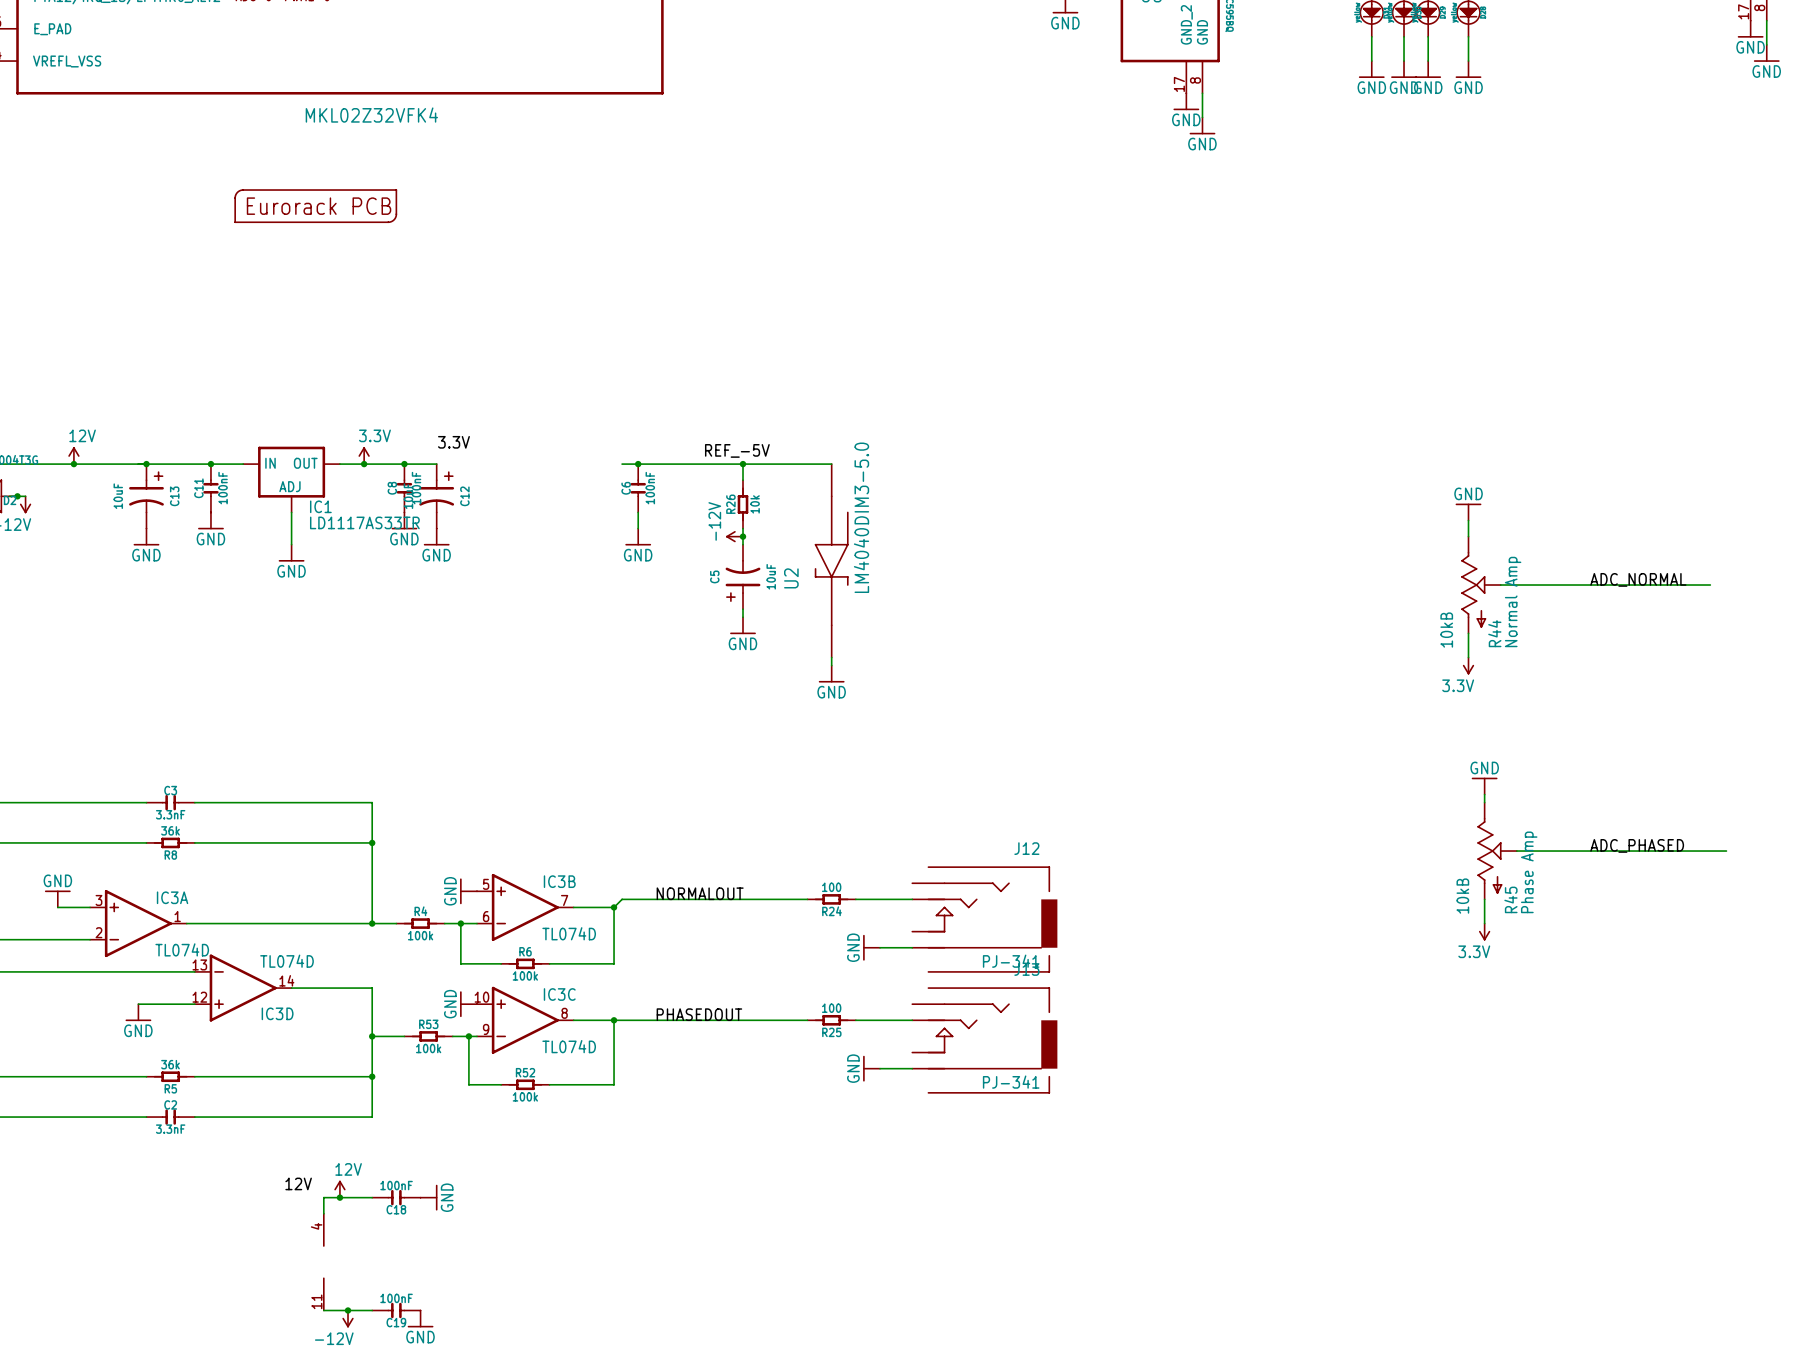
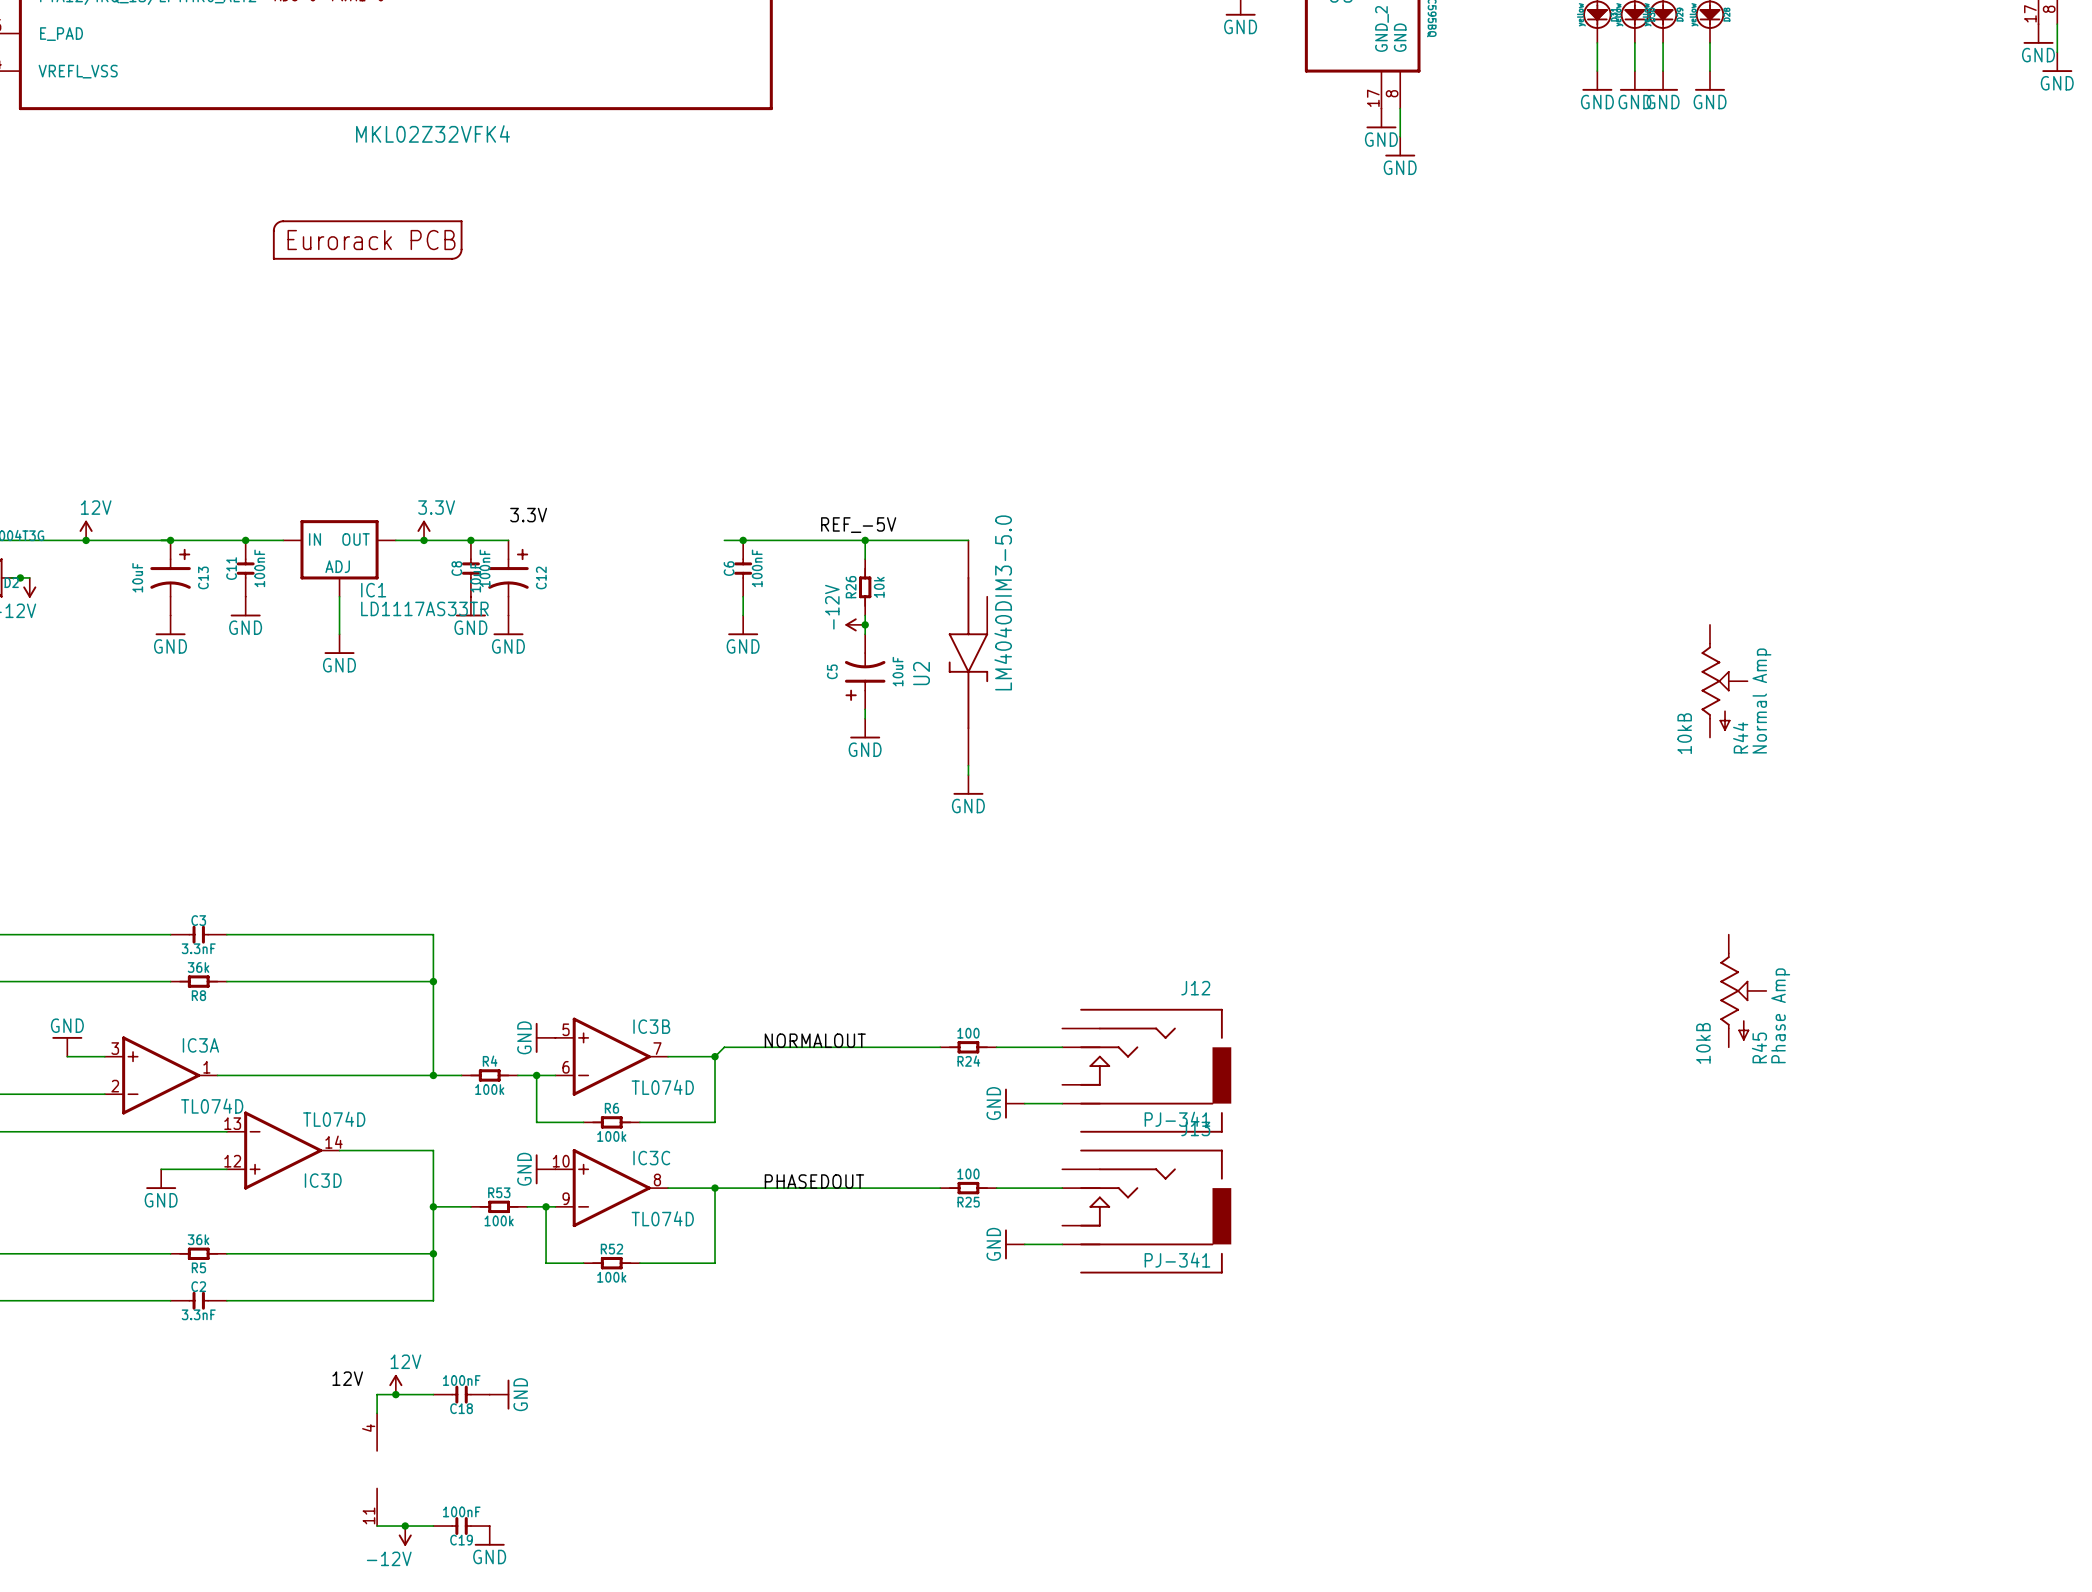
power symbol: GND (1468, 512) -> none
wire: (1468, 520) (1468, 536) -> none
label: ADC_NORMAL (1638, 579) -> none
wire: (1500, 585) (1710, 585) -> none
wire: (1468, 633) (1468, 657) -> none
power symbol: 3.3V (1468, 666) -> none
power symbol: GND (1484, 786) -> none
wire: (1484, 794) (1484, 802) -> none
label: ADC_PHASED (1637, 845) -> none
wire: (1516, 851) (1726, 851) -> none
wire: (1484, 899) (1484, 923) -> none
power symbol: 3.3V (1484, 932) -> none

